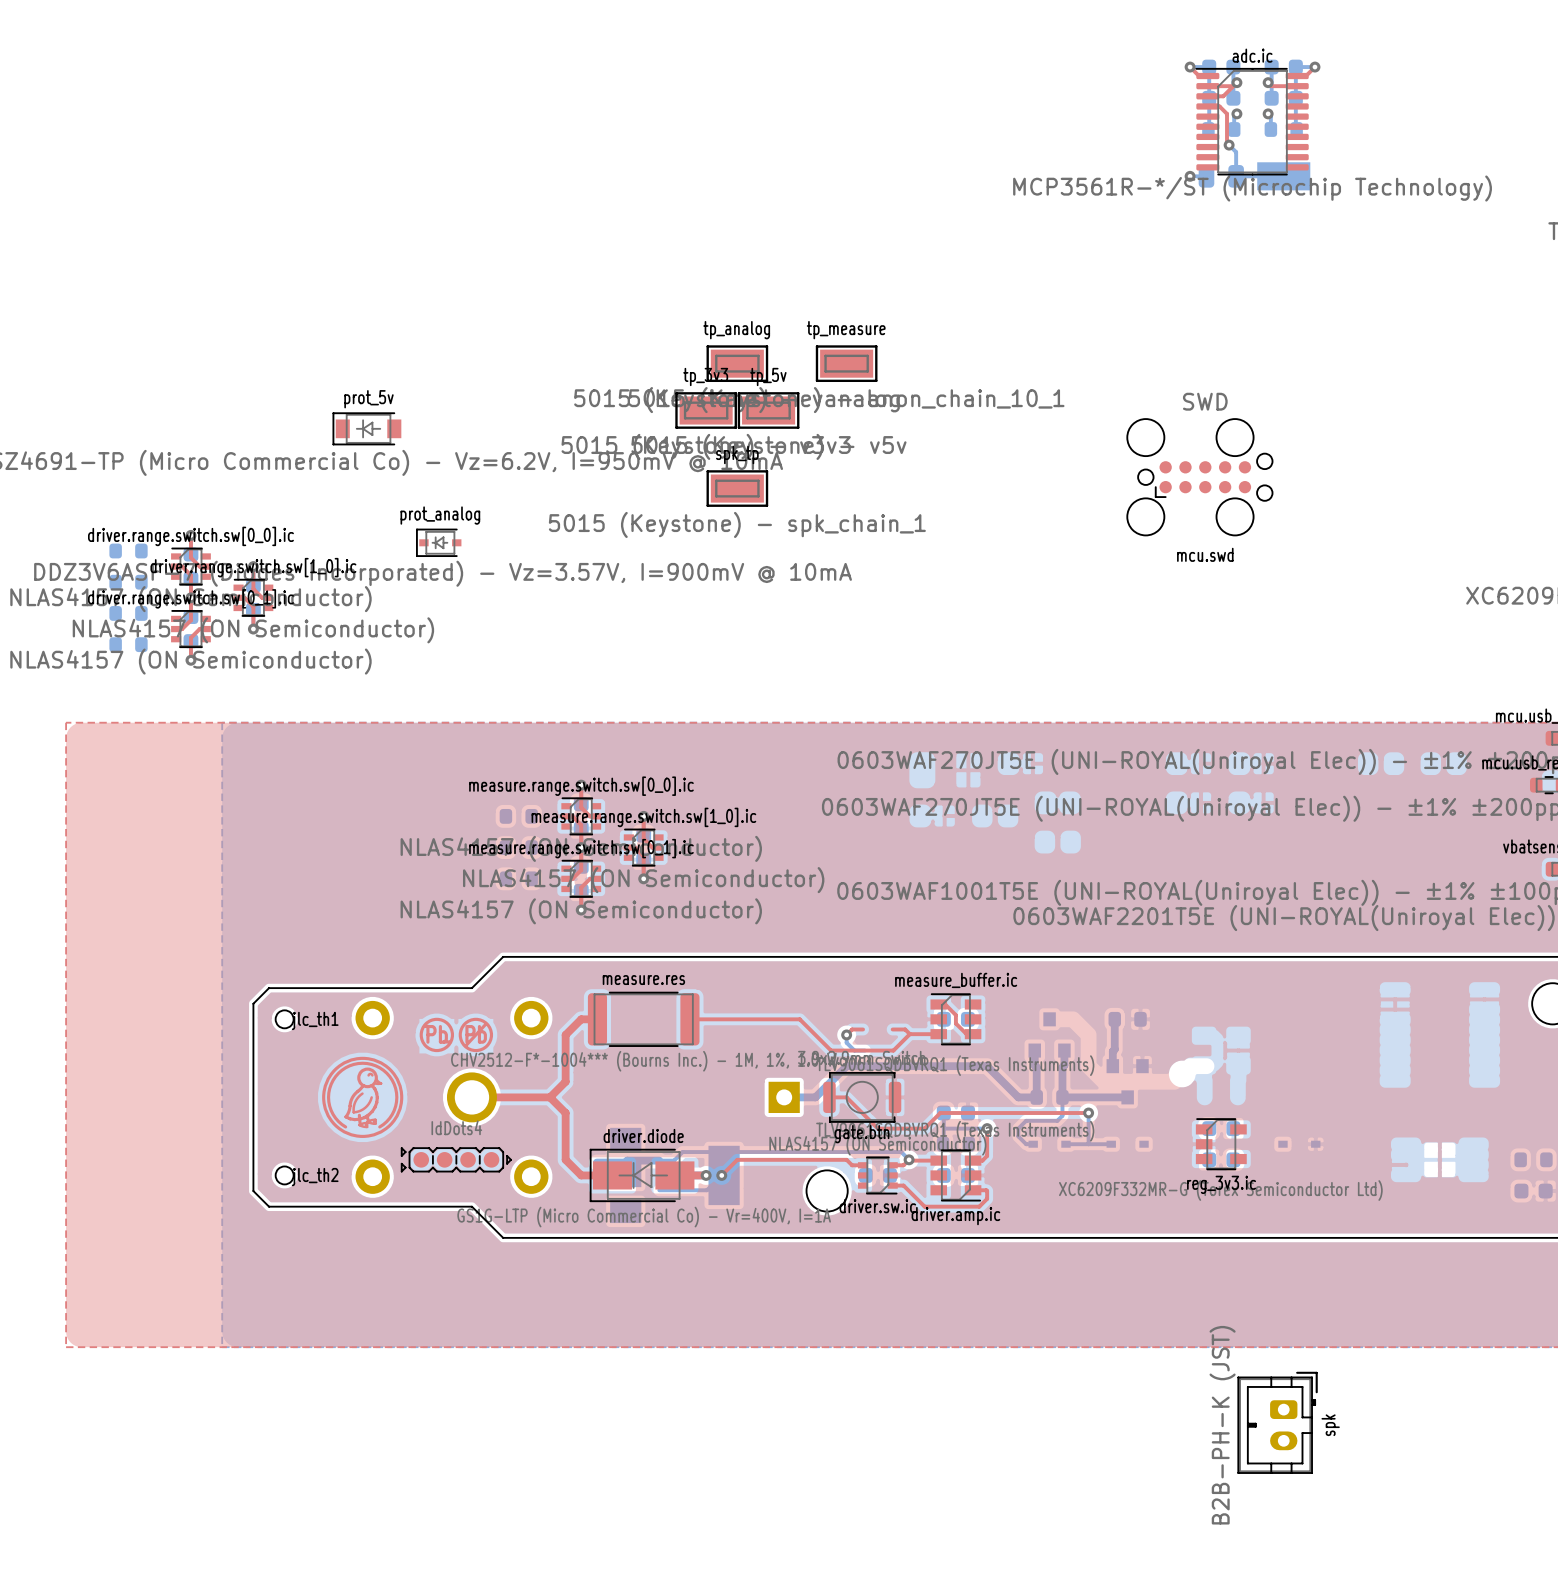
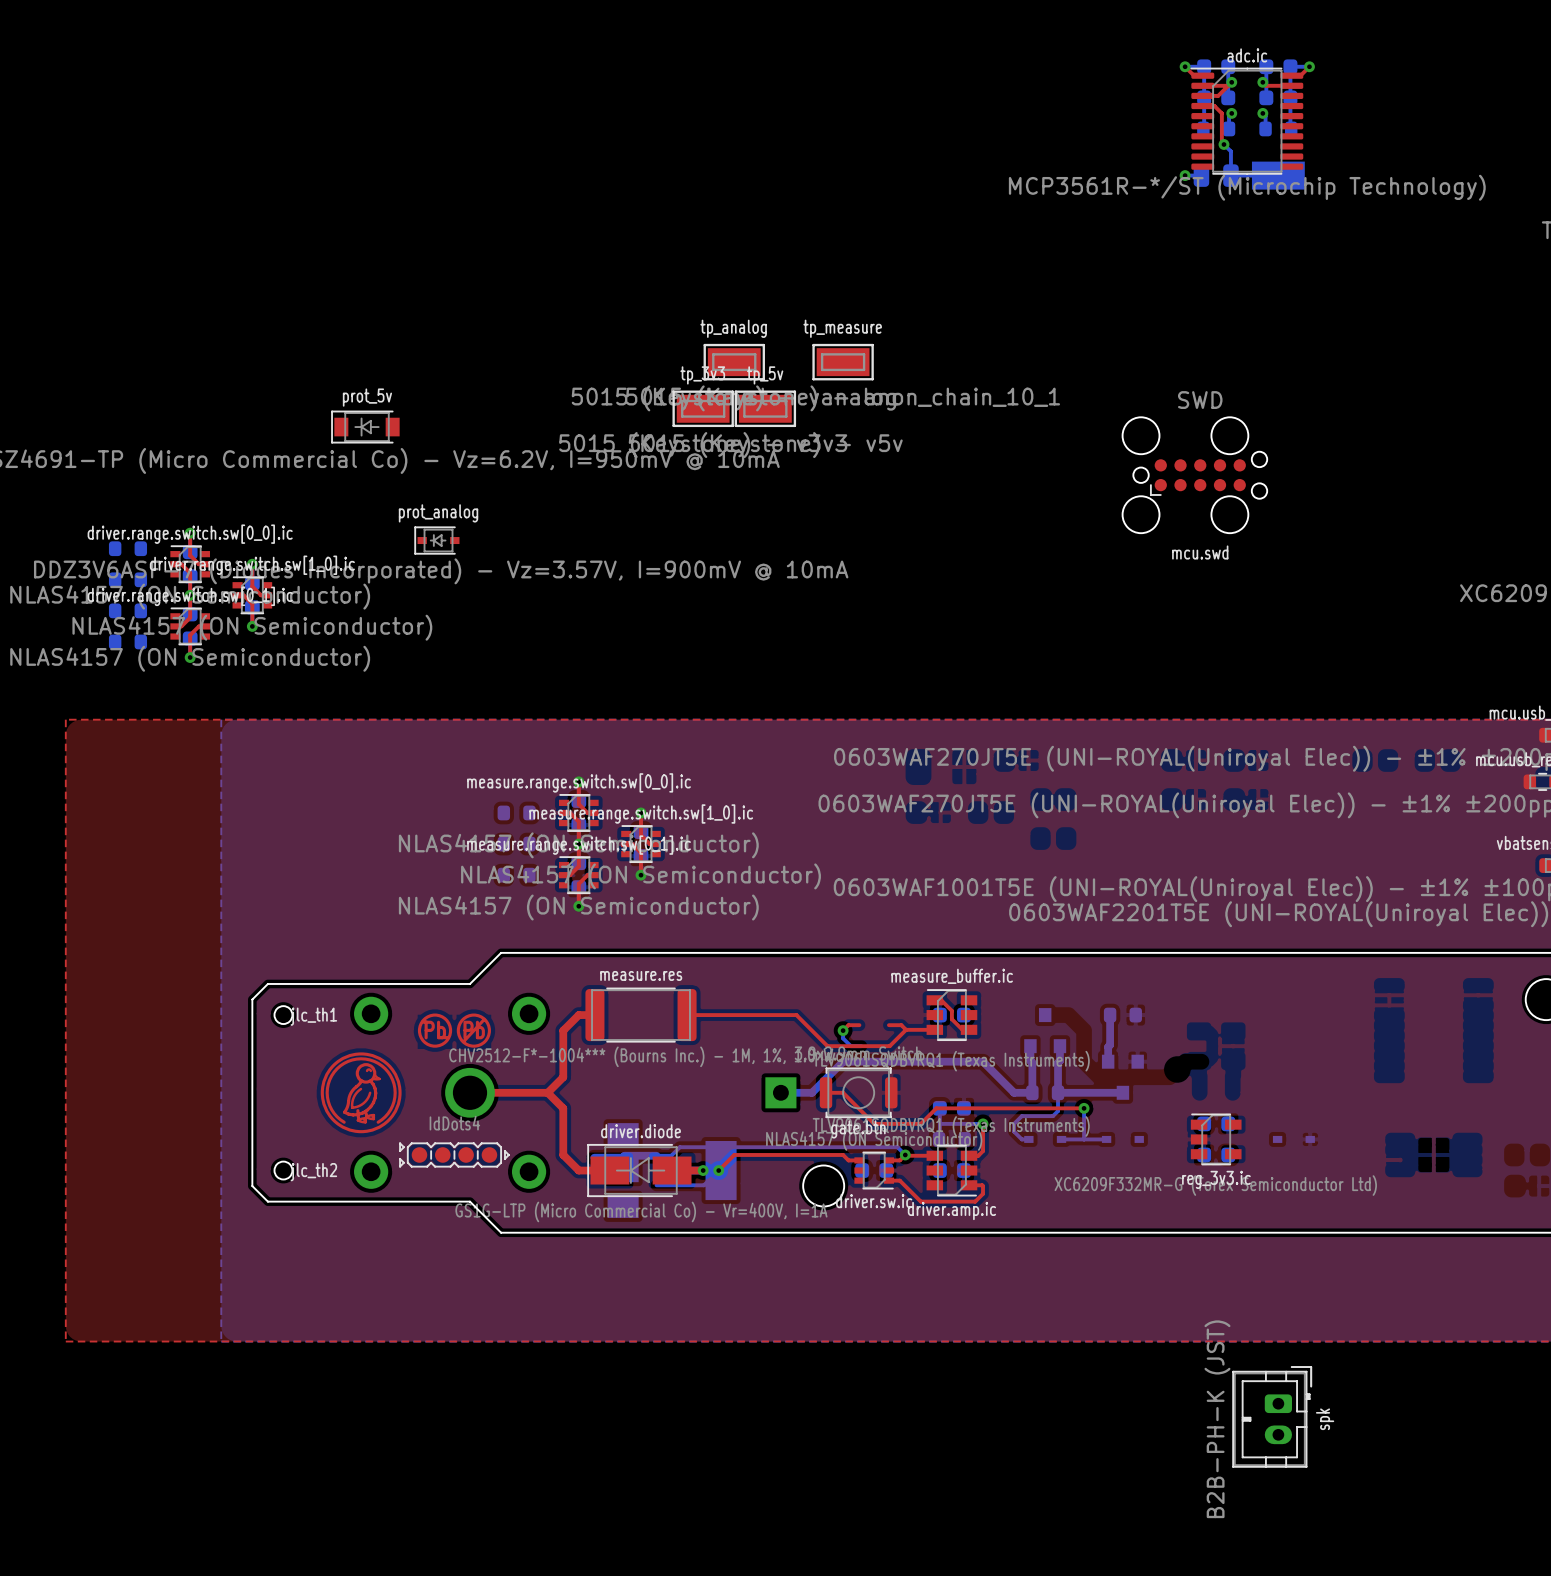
spk_tp: 5015 (Keystone) - spk_chain_1 (737, 488) -> none
part: (1533, 1159) -> none
part: (1533, 1191) -> none

